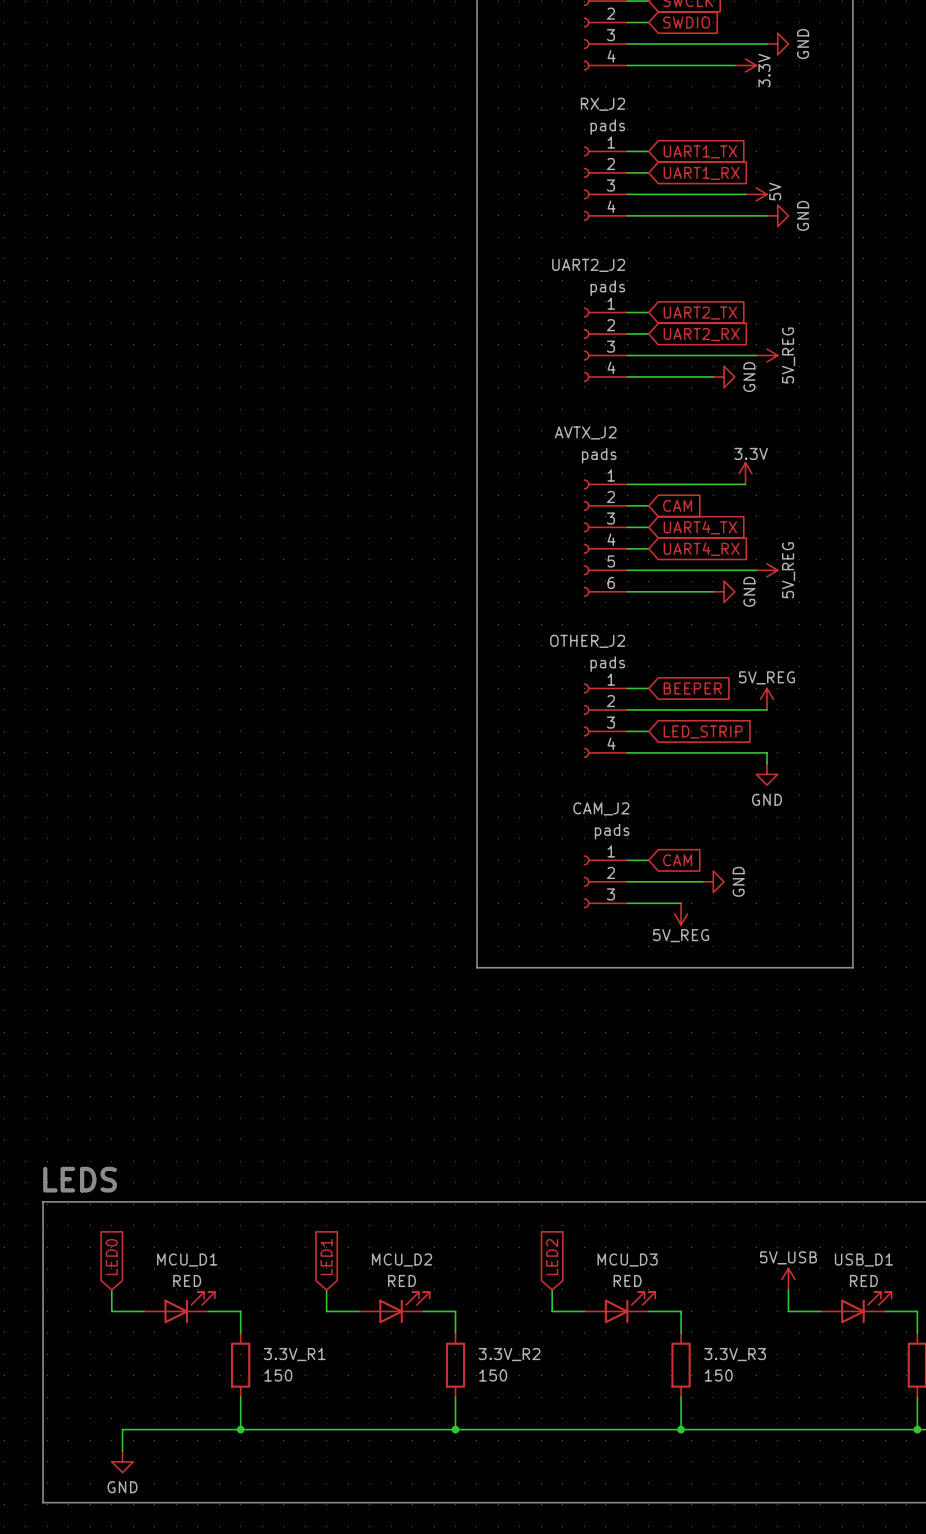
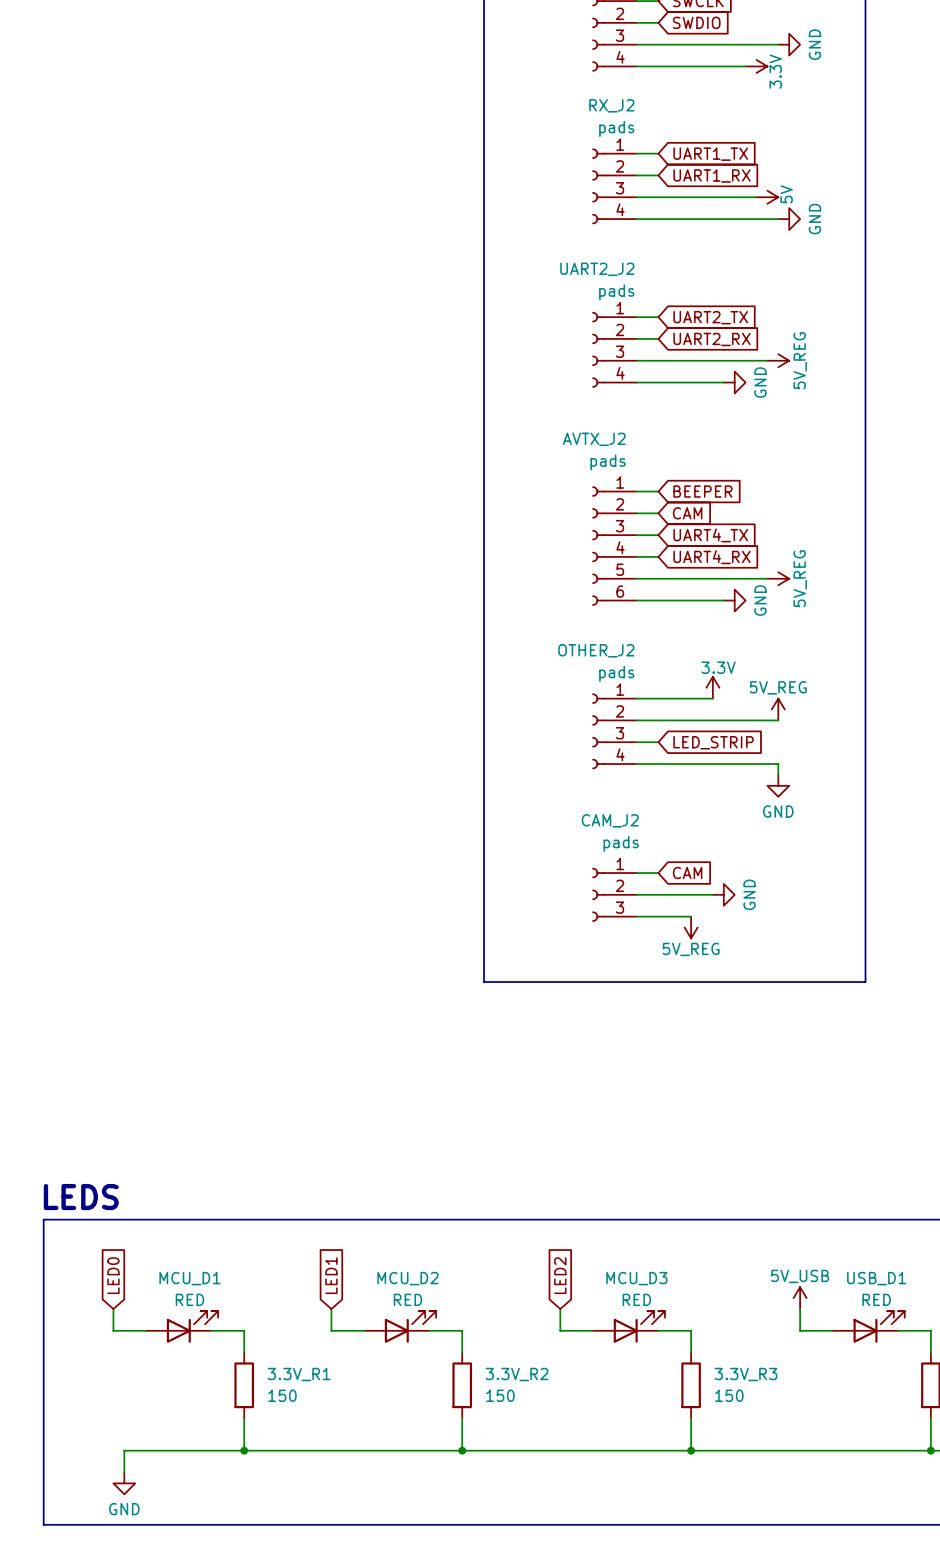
power symbol position: 3.3V (745, 473) -> 3.3V (712, 687)
wire: (648, 484) (745, 484) -> none
wire: none -> (658, 698) (712, 698)
global label position: BEEPER (692, 688) -> BEEPER (702, 491)

